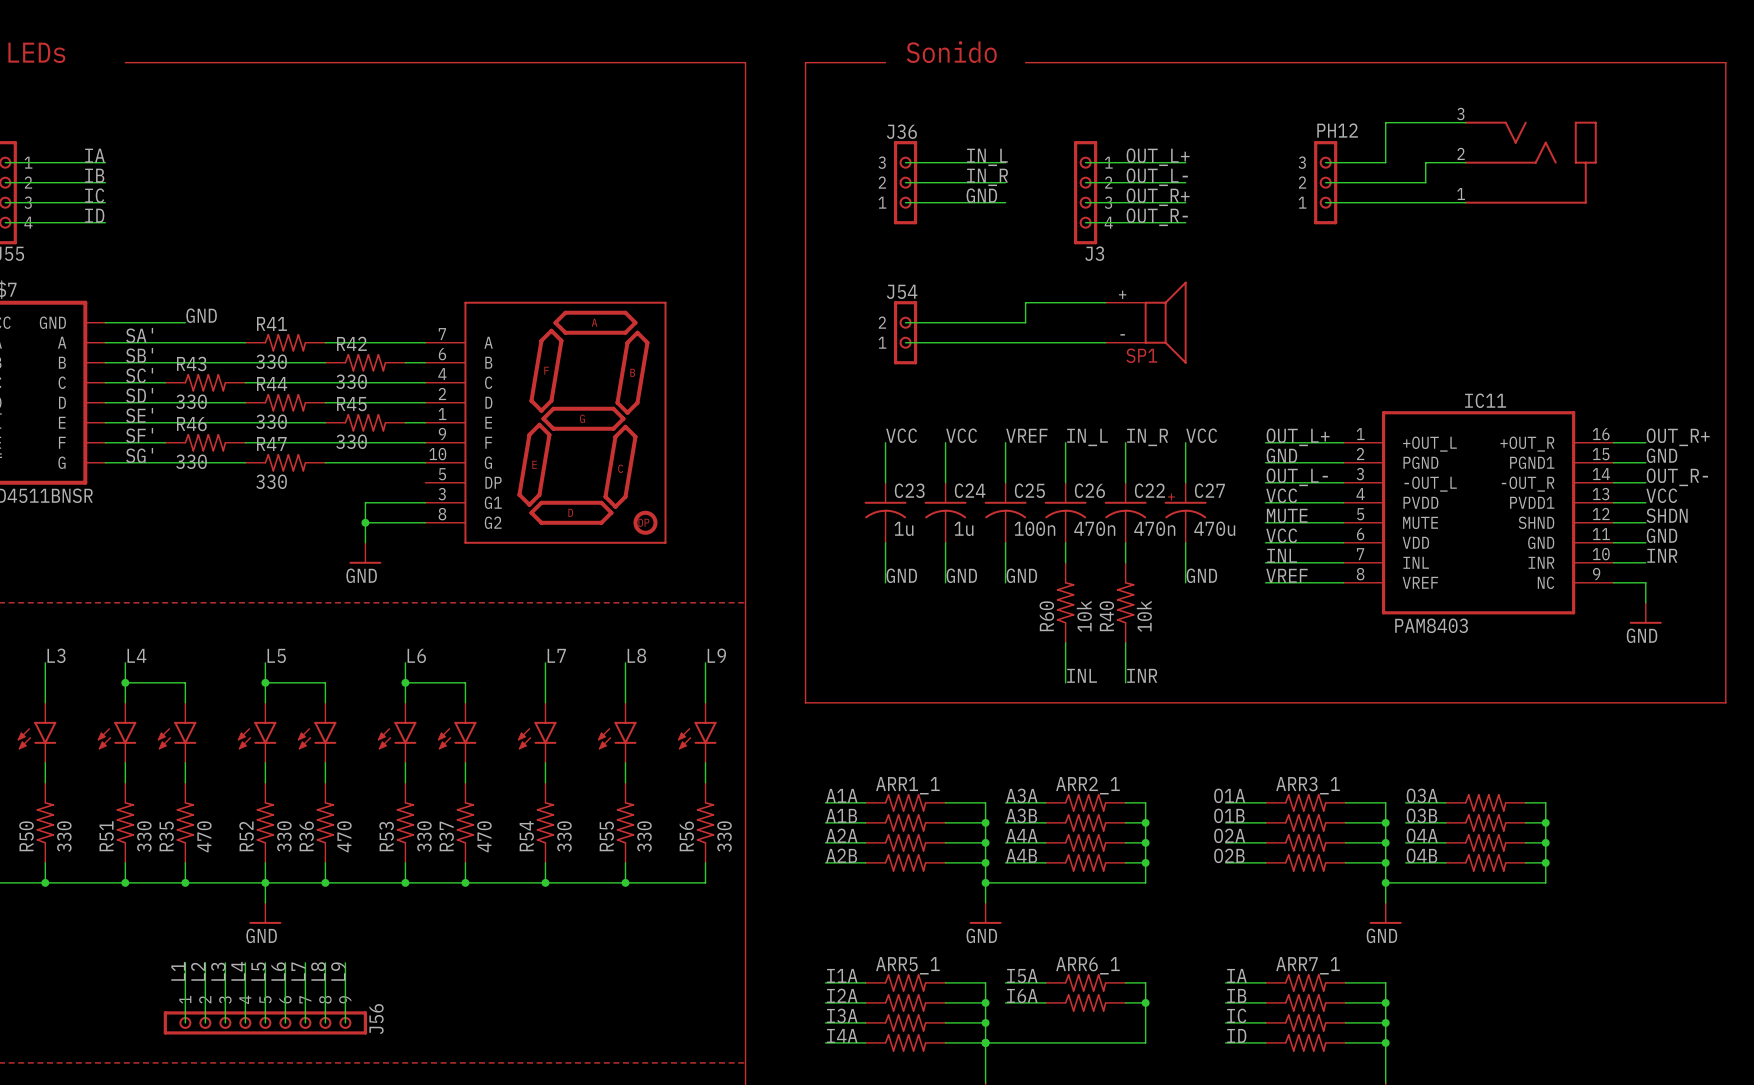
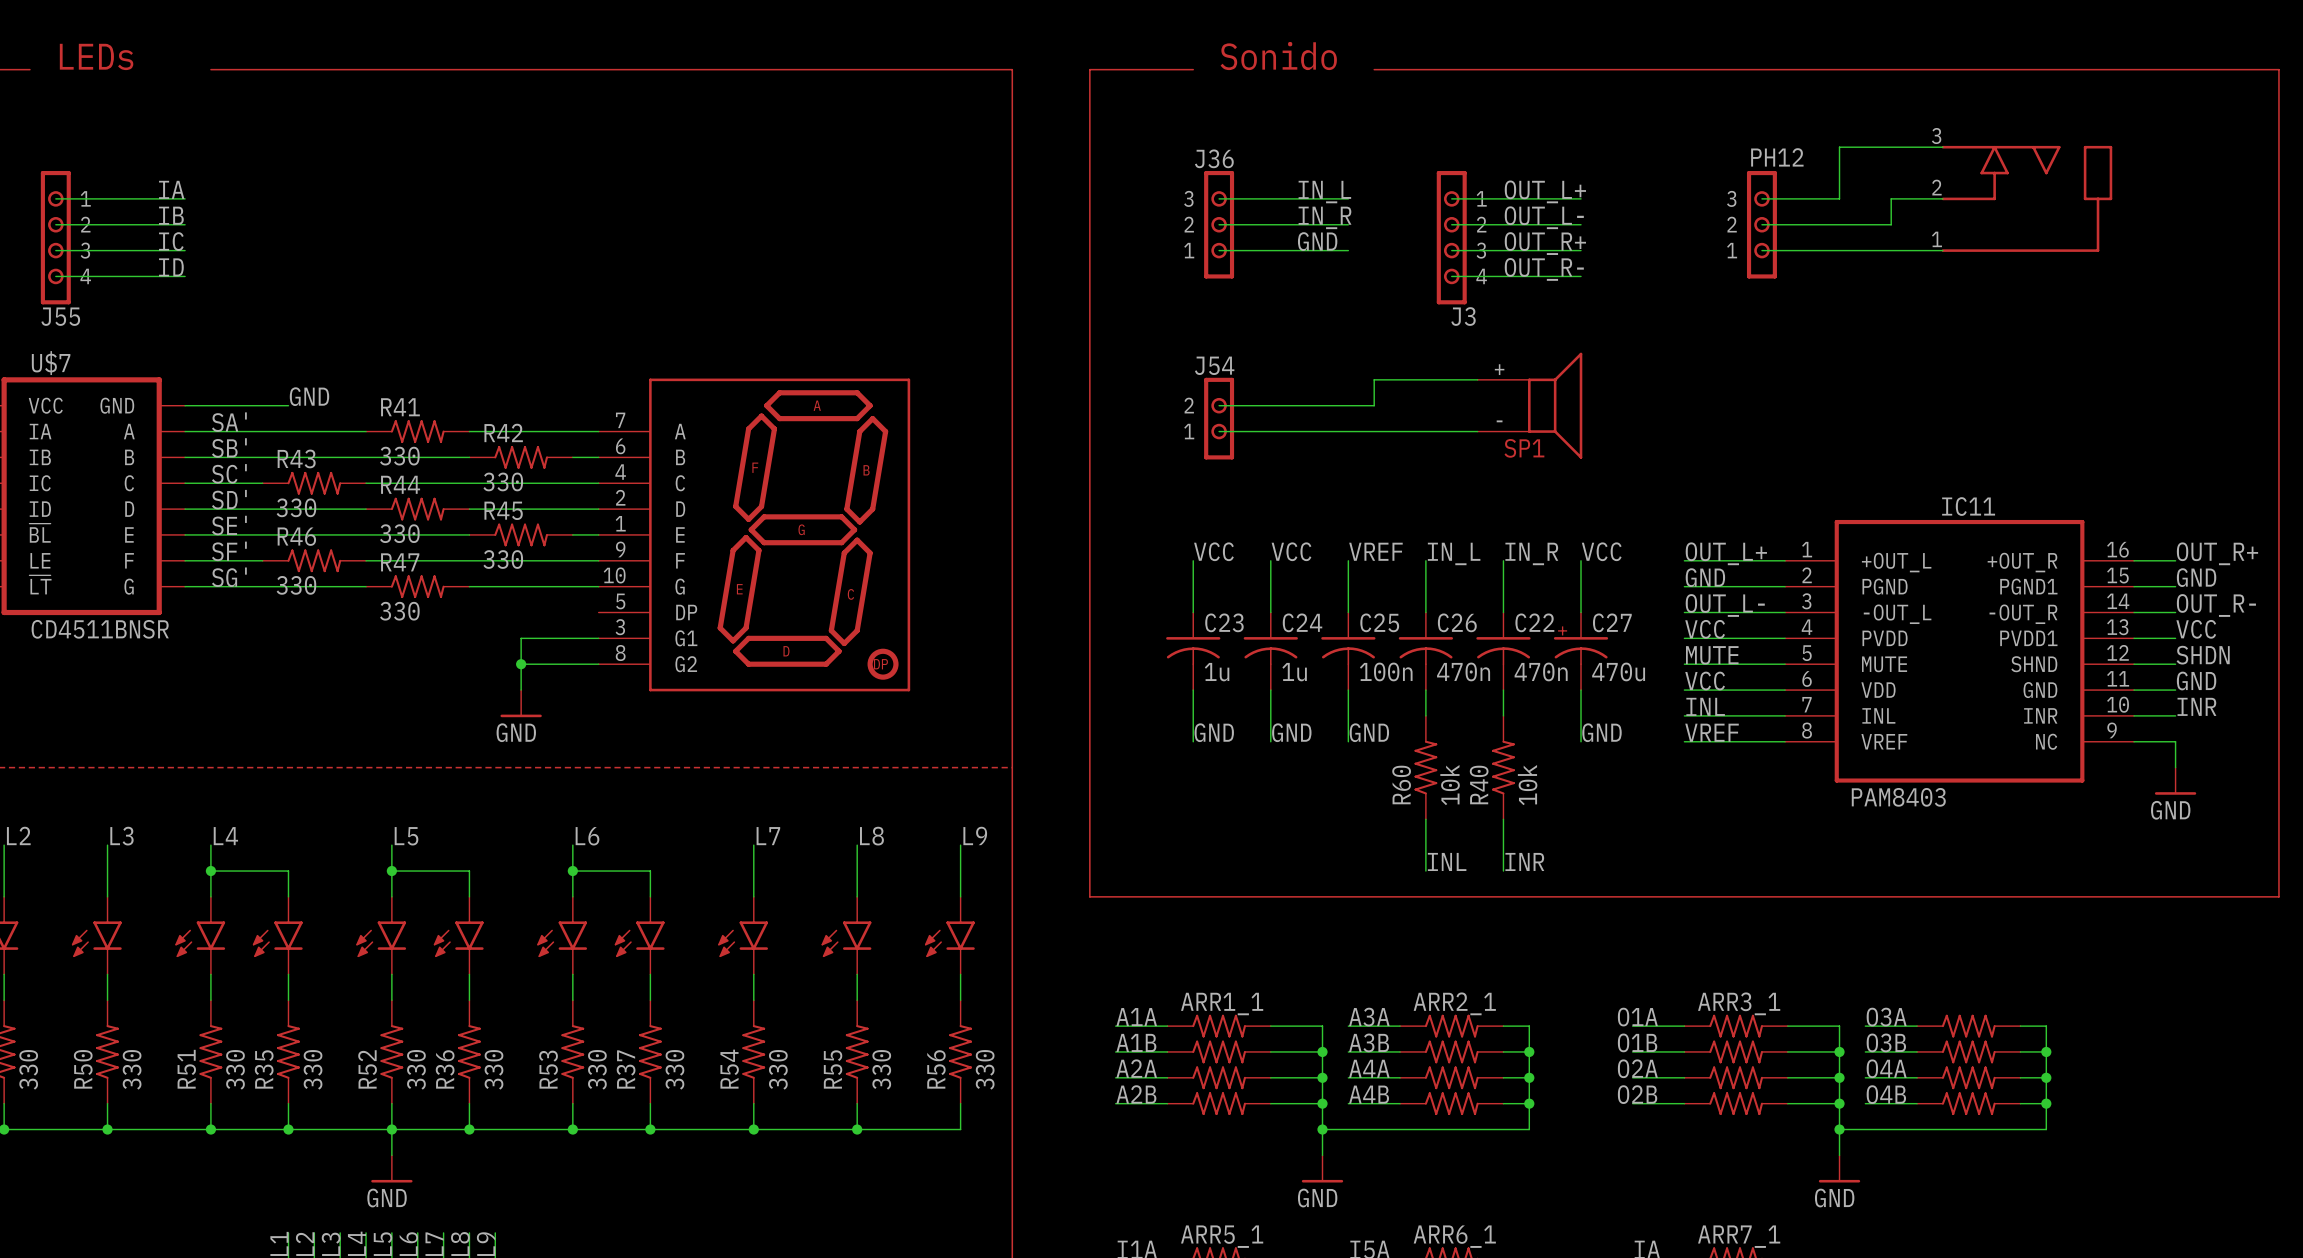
part symbol: [1464, 121, 1597, 204] -> [1941, 145, 2113, 252]
R35 value: 470 (204, 836) -> 330 (313, 1069)
R36 value: 470 (344, 836) -> 330 (493, 1069)
R37 value: 470 (484, 836) -> 330 (674, 1069)

